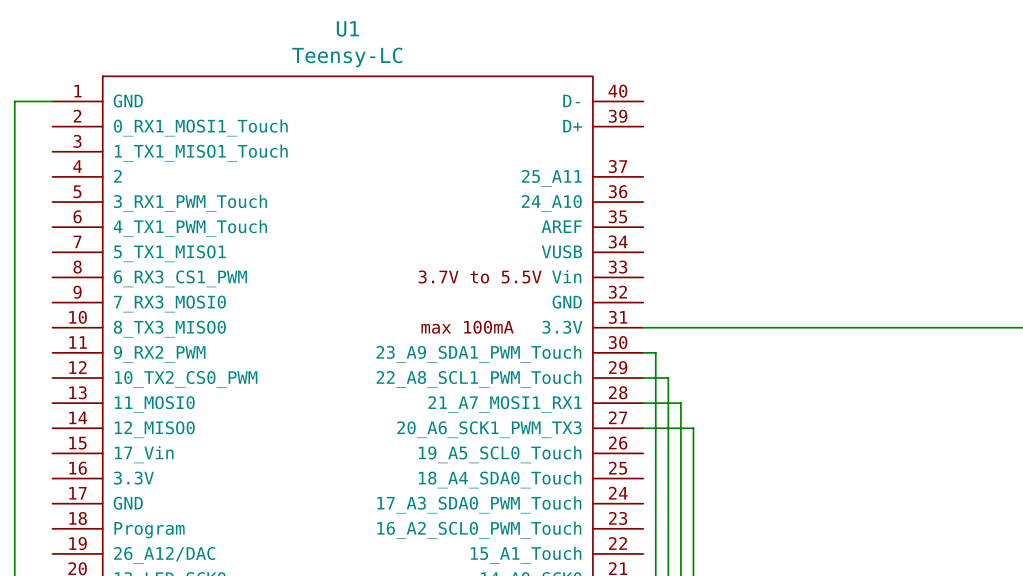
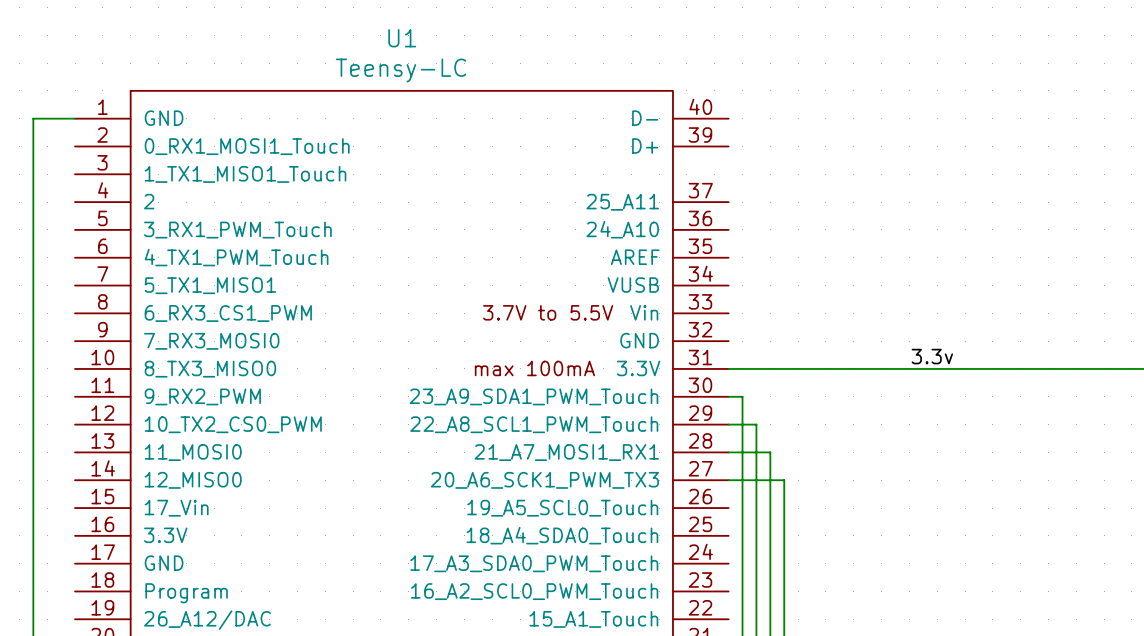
label: none -> 3.3v (932, 356)

